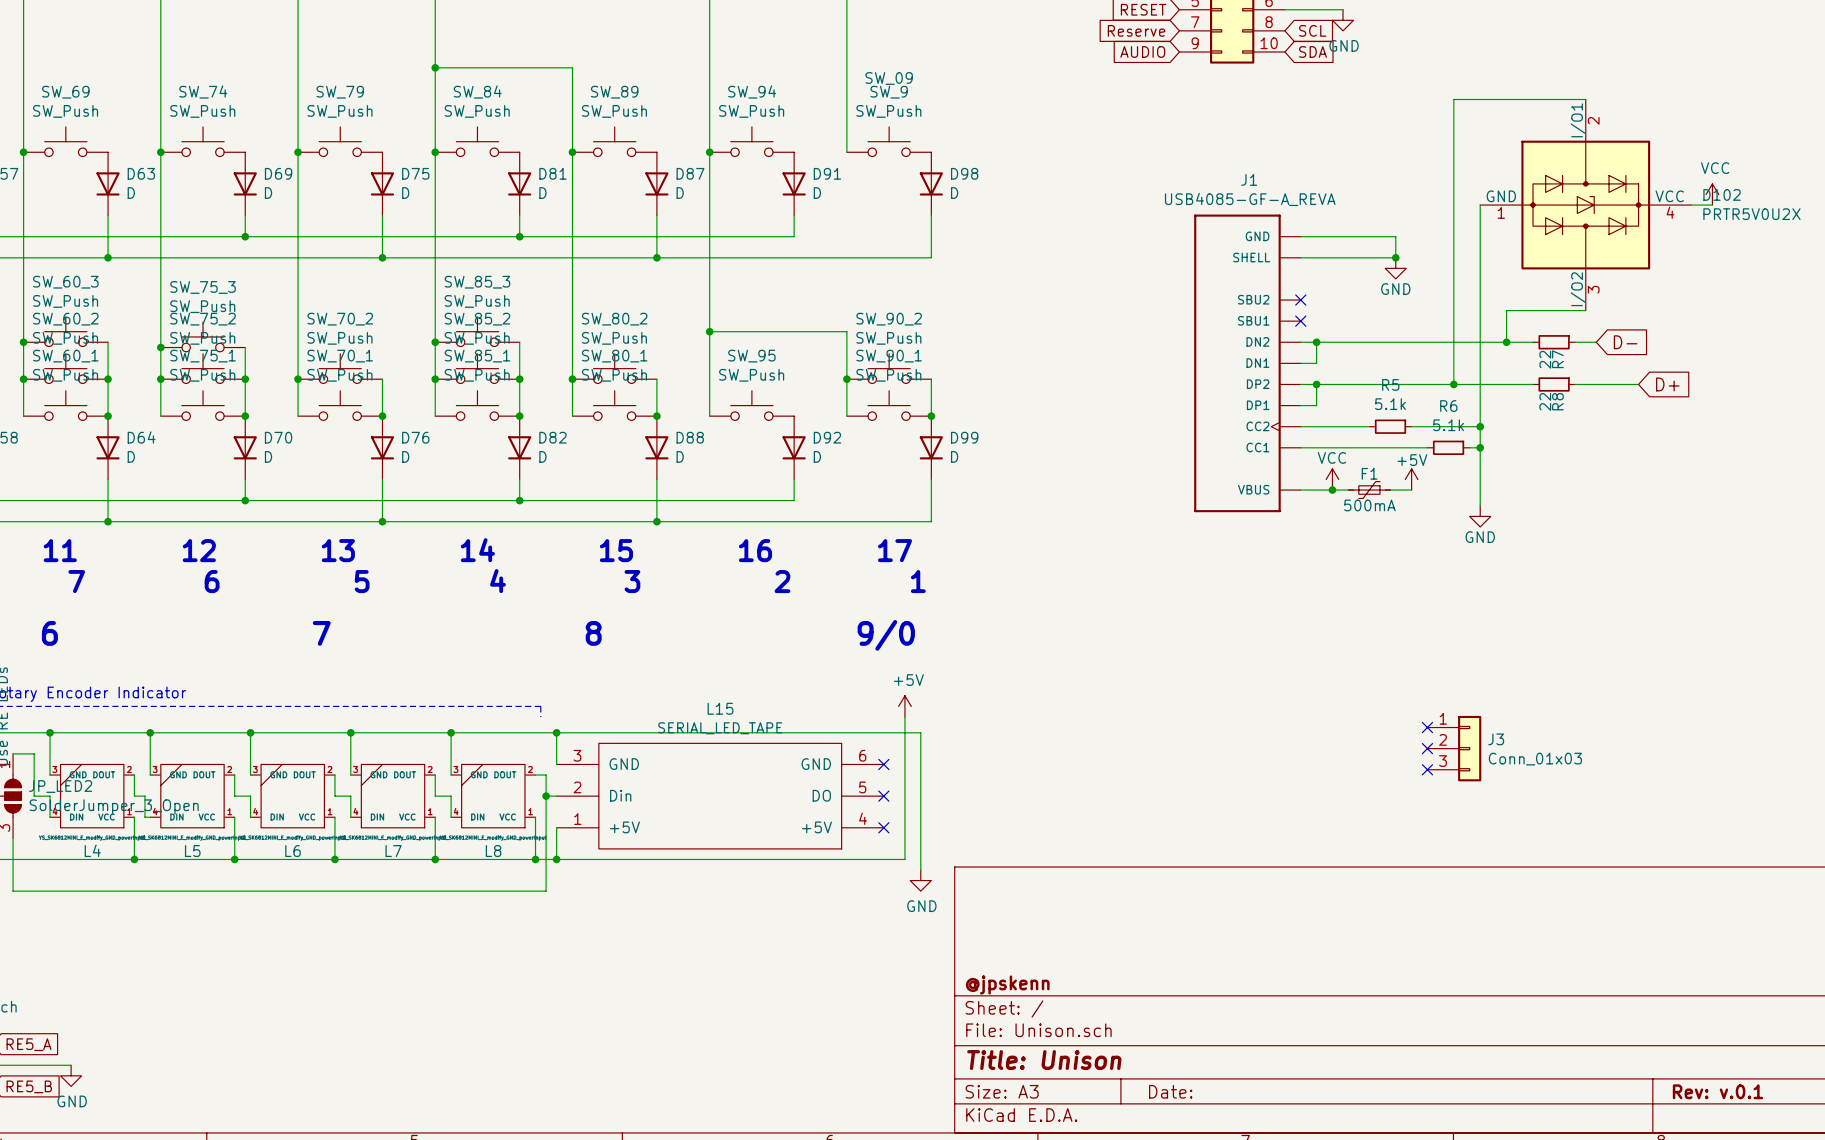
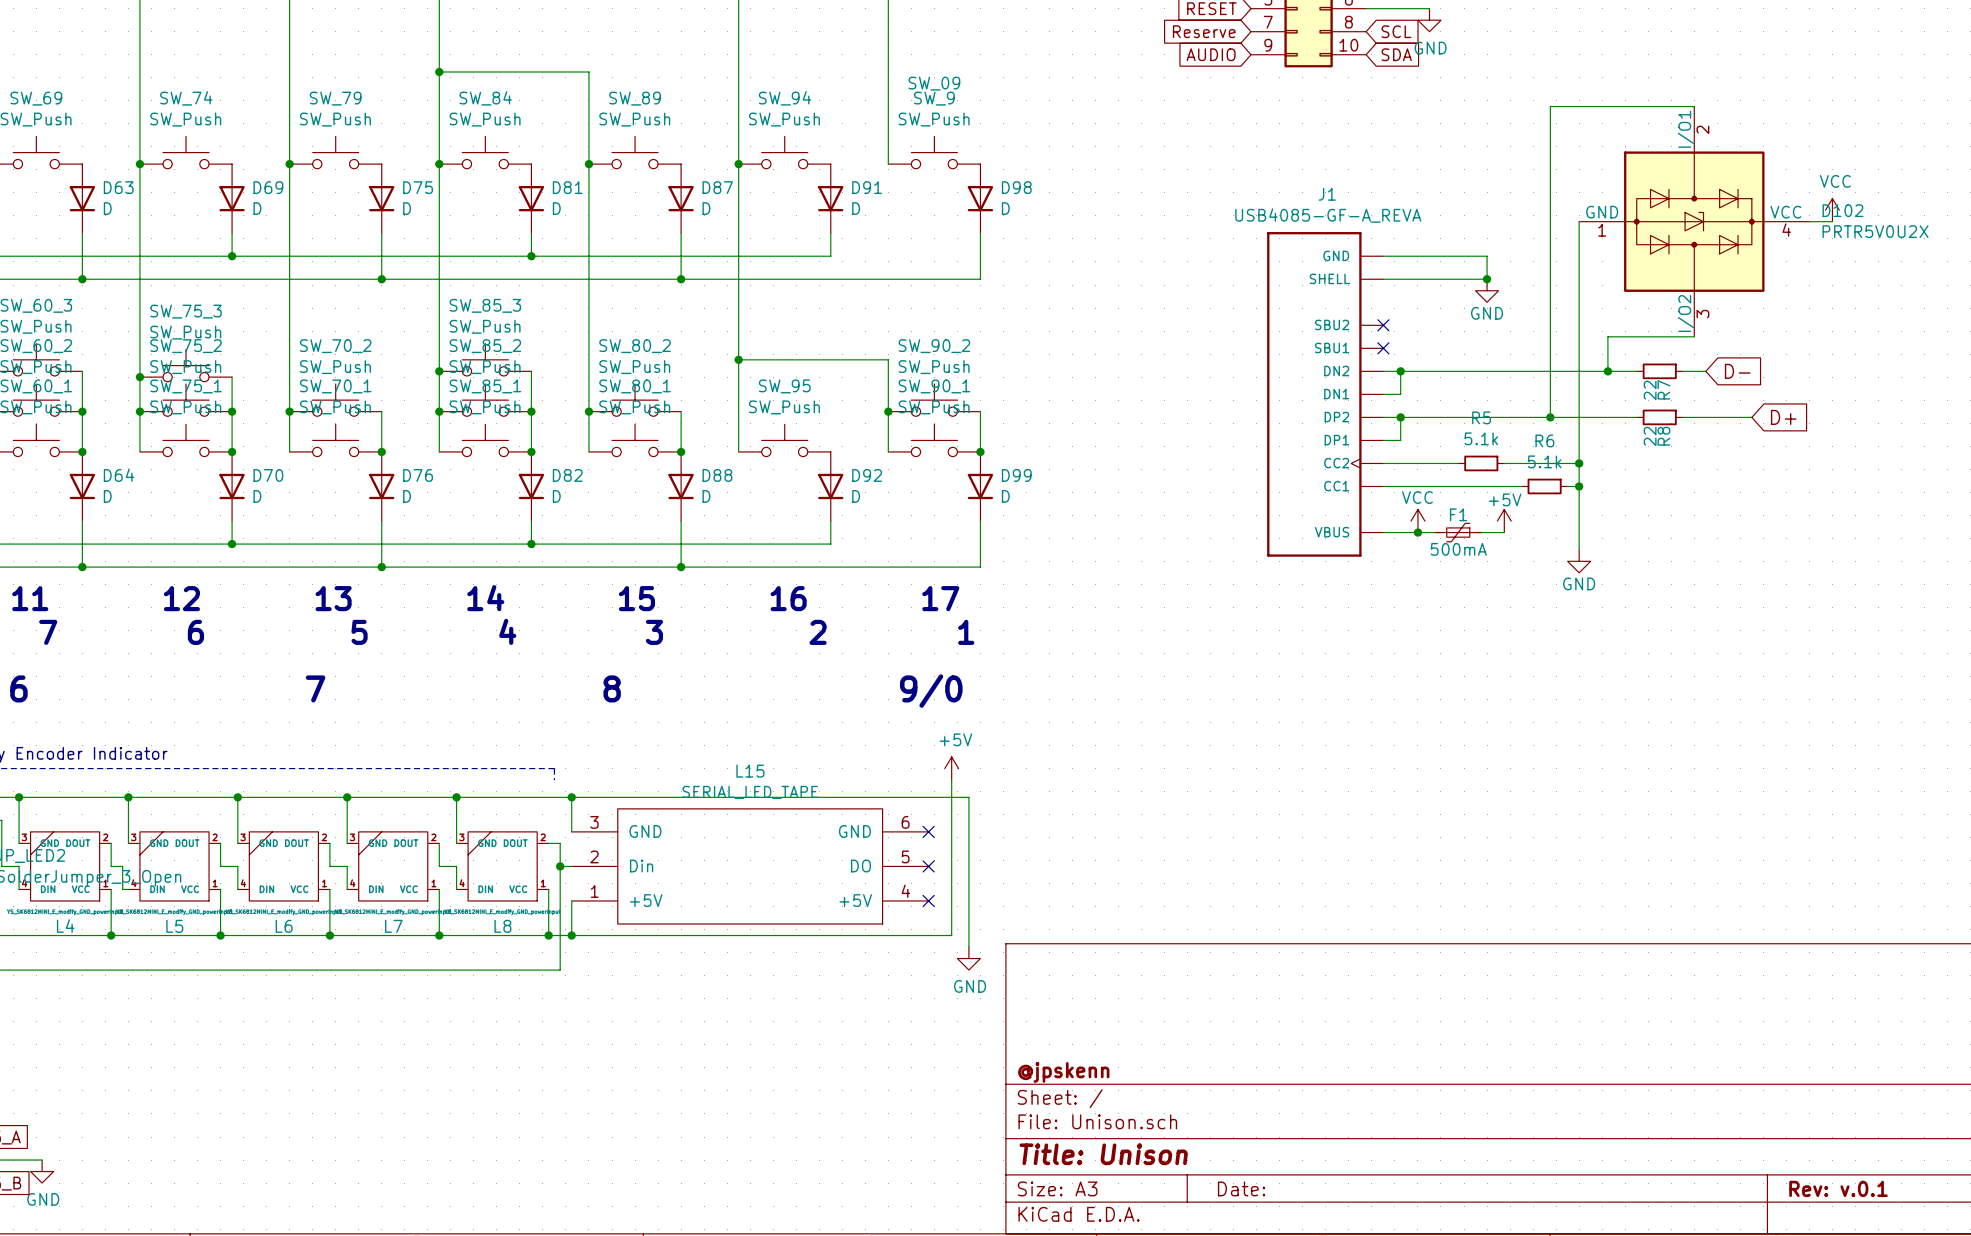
no-connect mark: (1427, 727) -> none
no-connect mark: (1427, 748) -> none
J3: Conn_01x03 (1454, 748) -> none
no-connect mark: (1427, 769) -> none

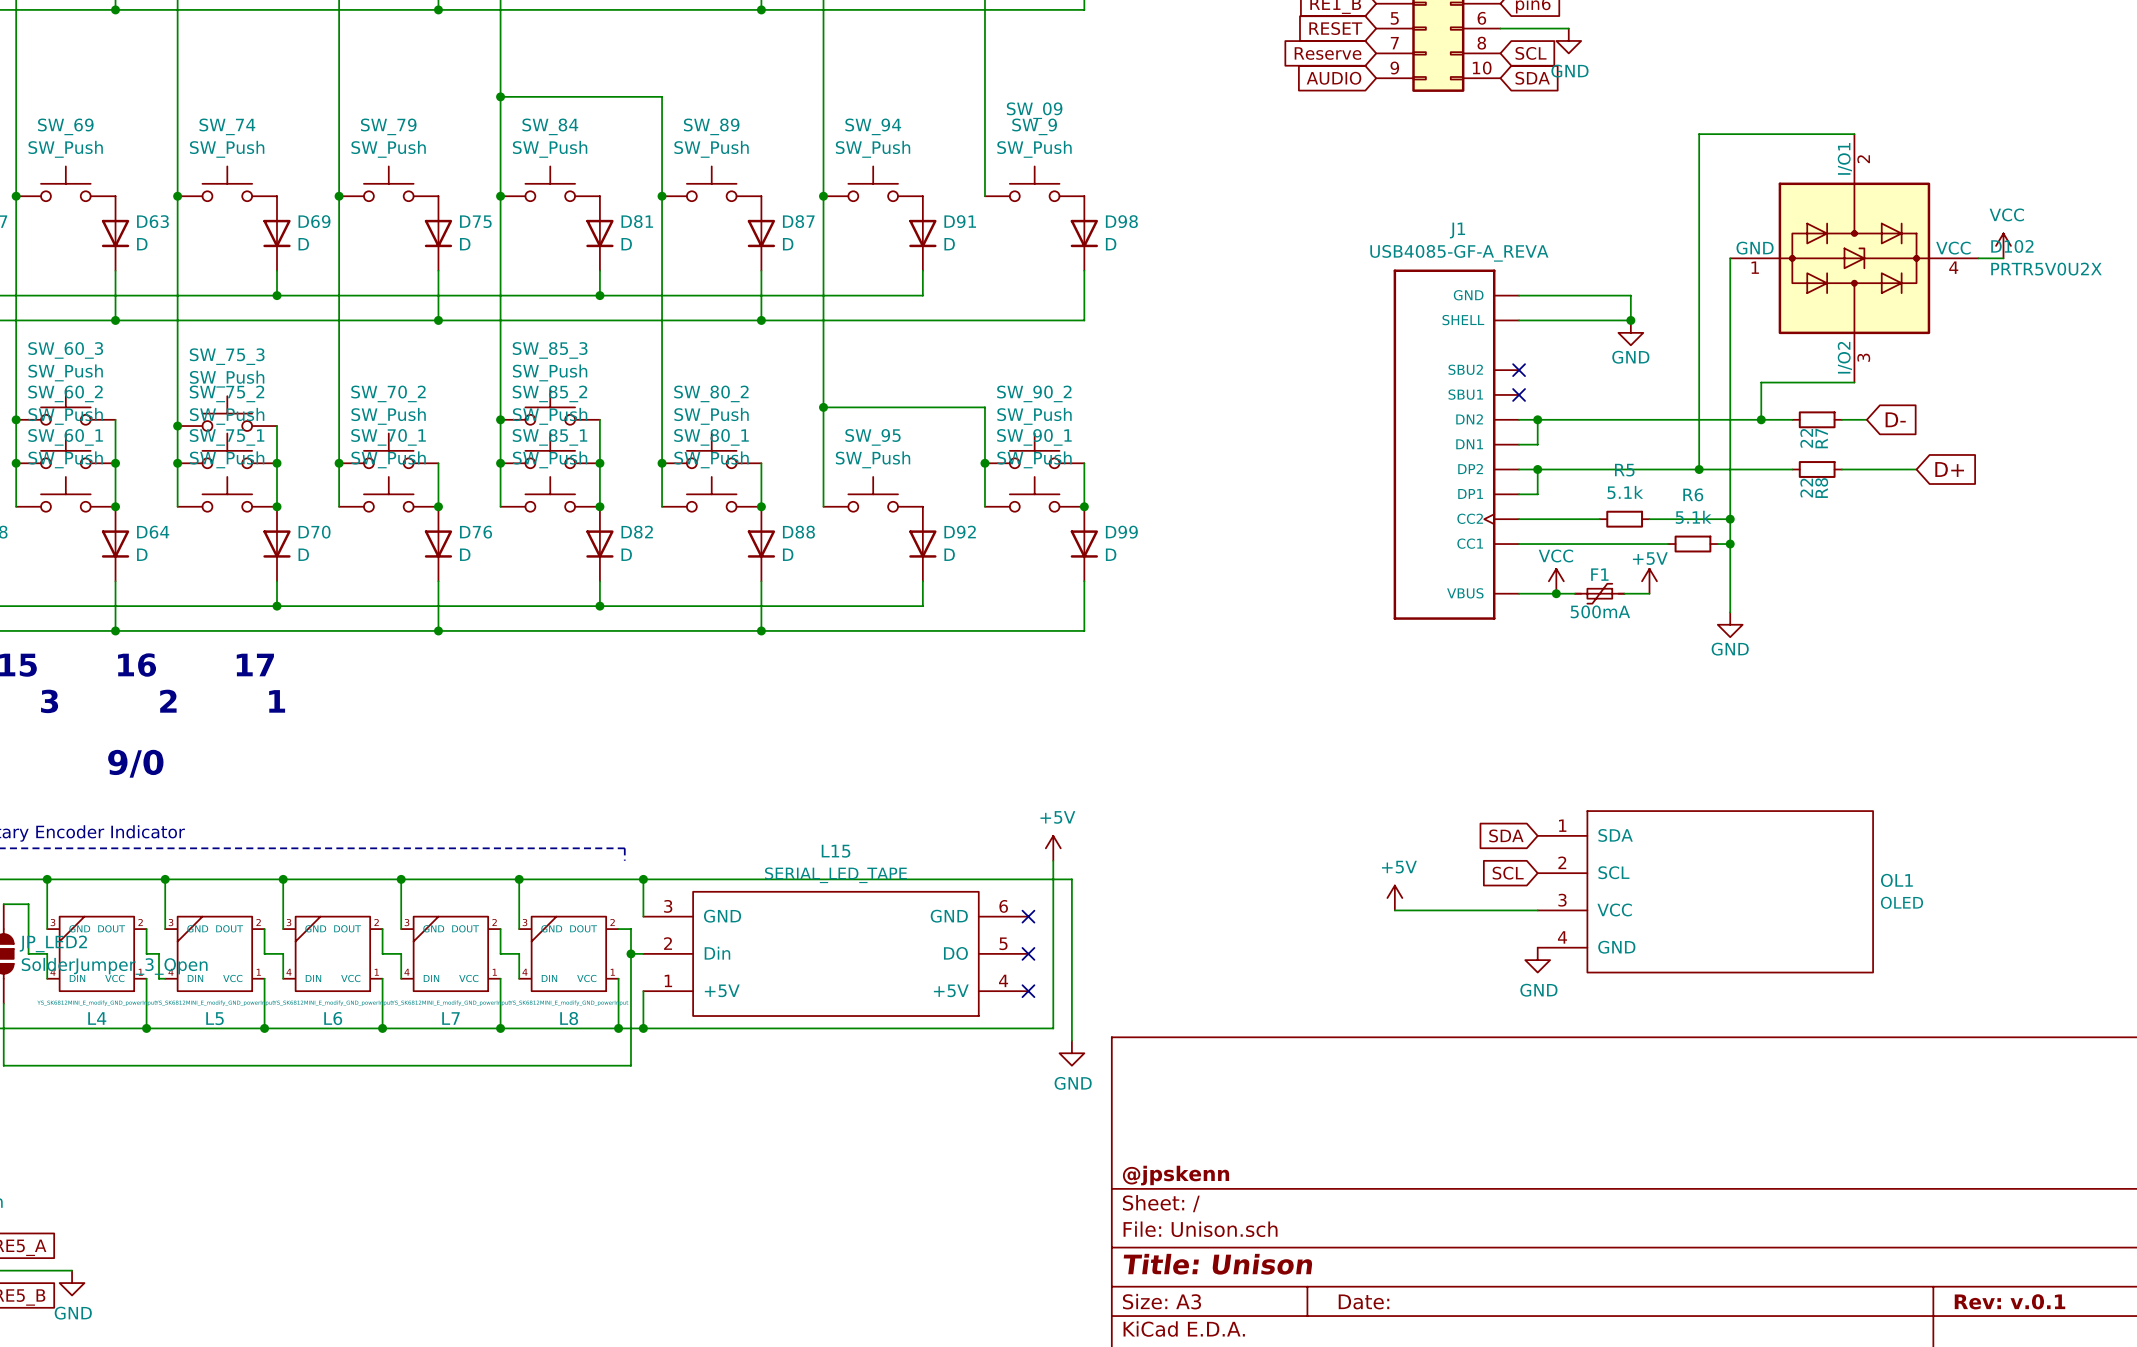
global label: none -> SDA (1506, 835)
global label: none -> SCL (1508, 873)
OL1: none -> OLED (1705, 891)
power symbol: none -> +5V (1394, 898)
wire: none -> (1394, 910) (1537, 910)
power symbol: none -> GND (1537, 960)

